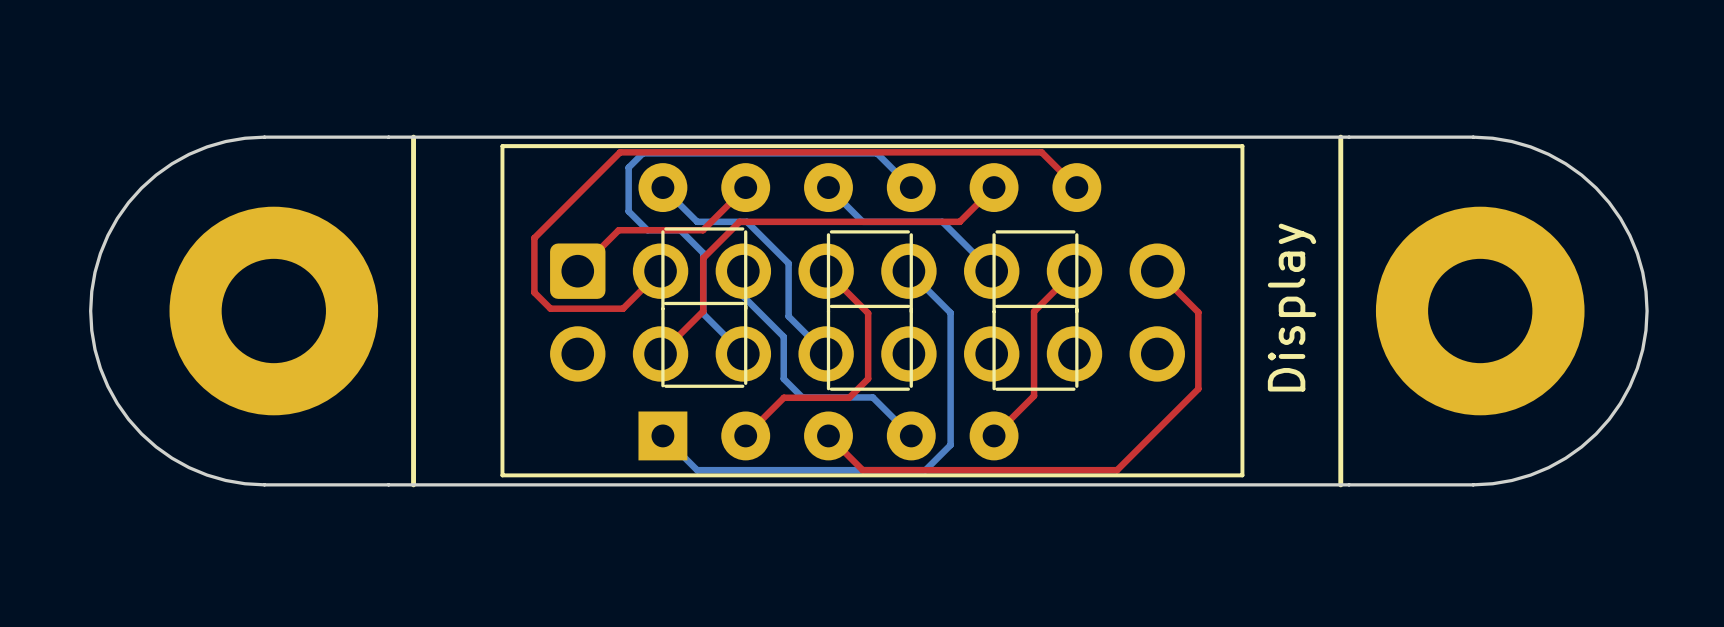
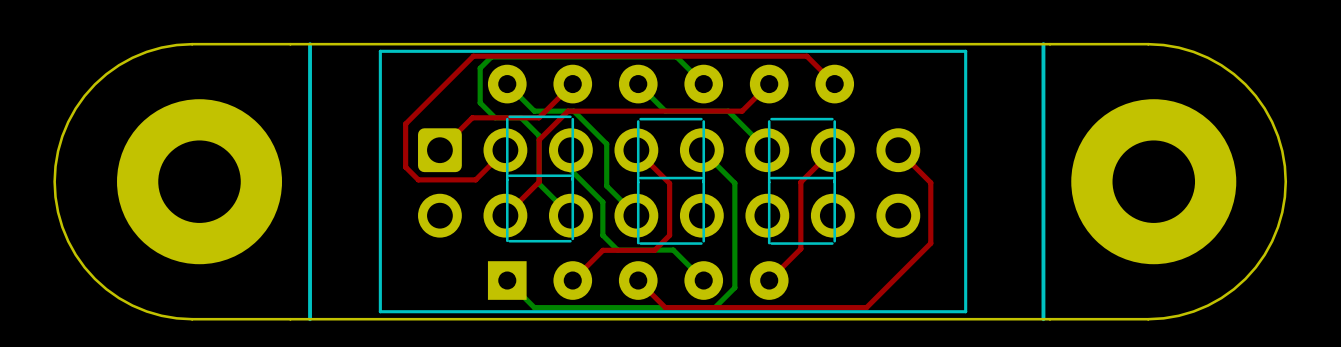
text: Display (1292, 307) -> none

